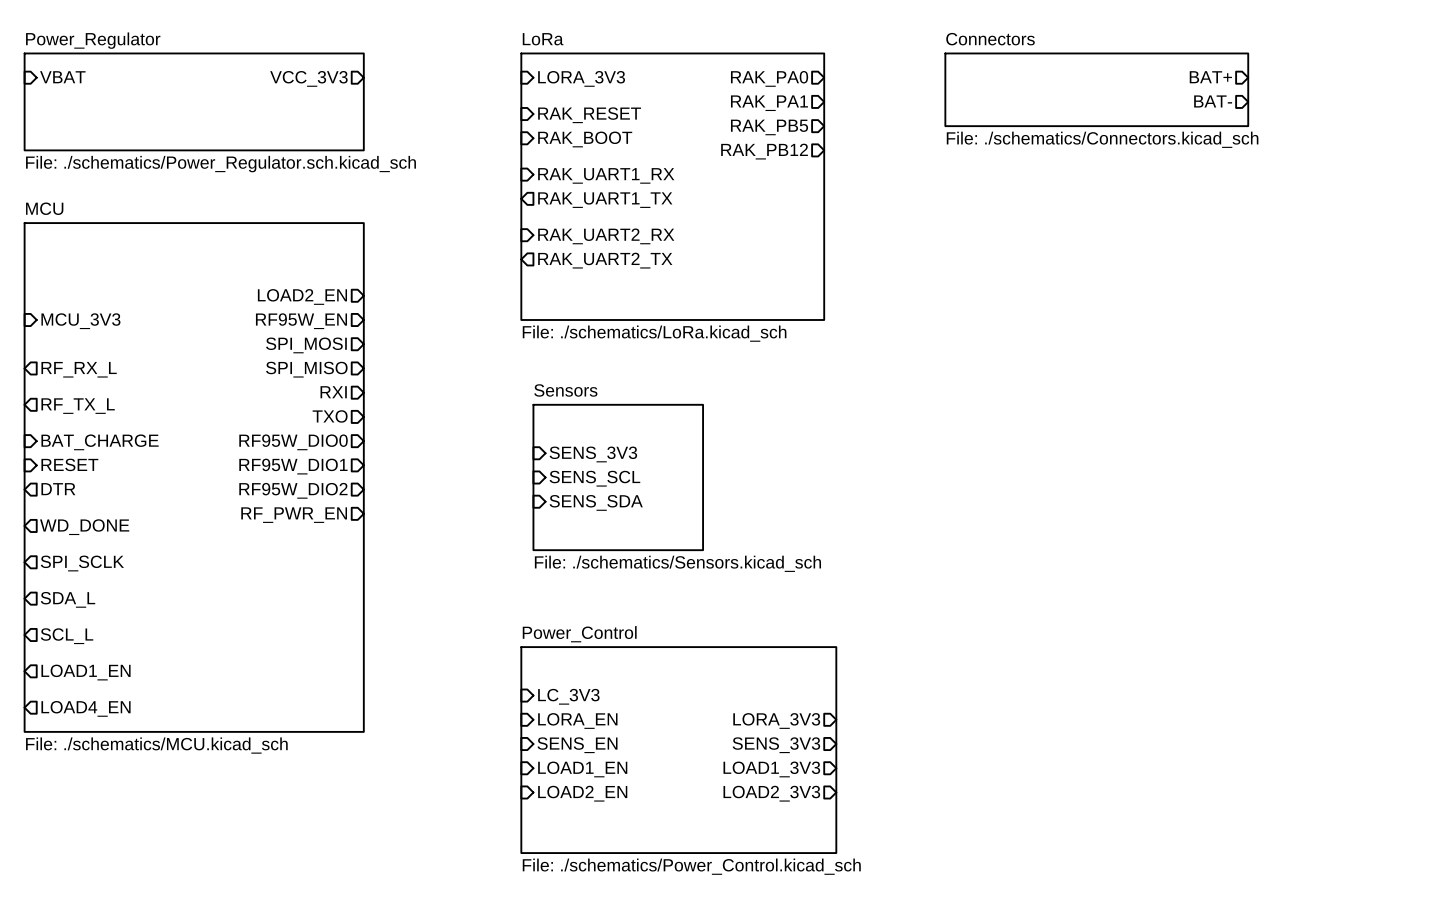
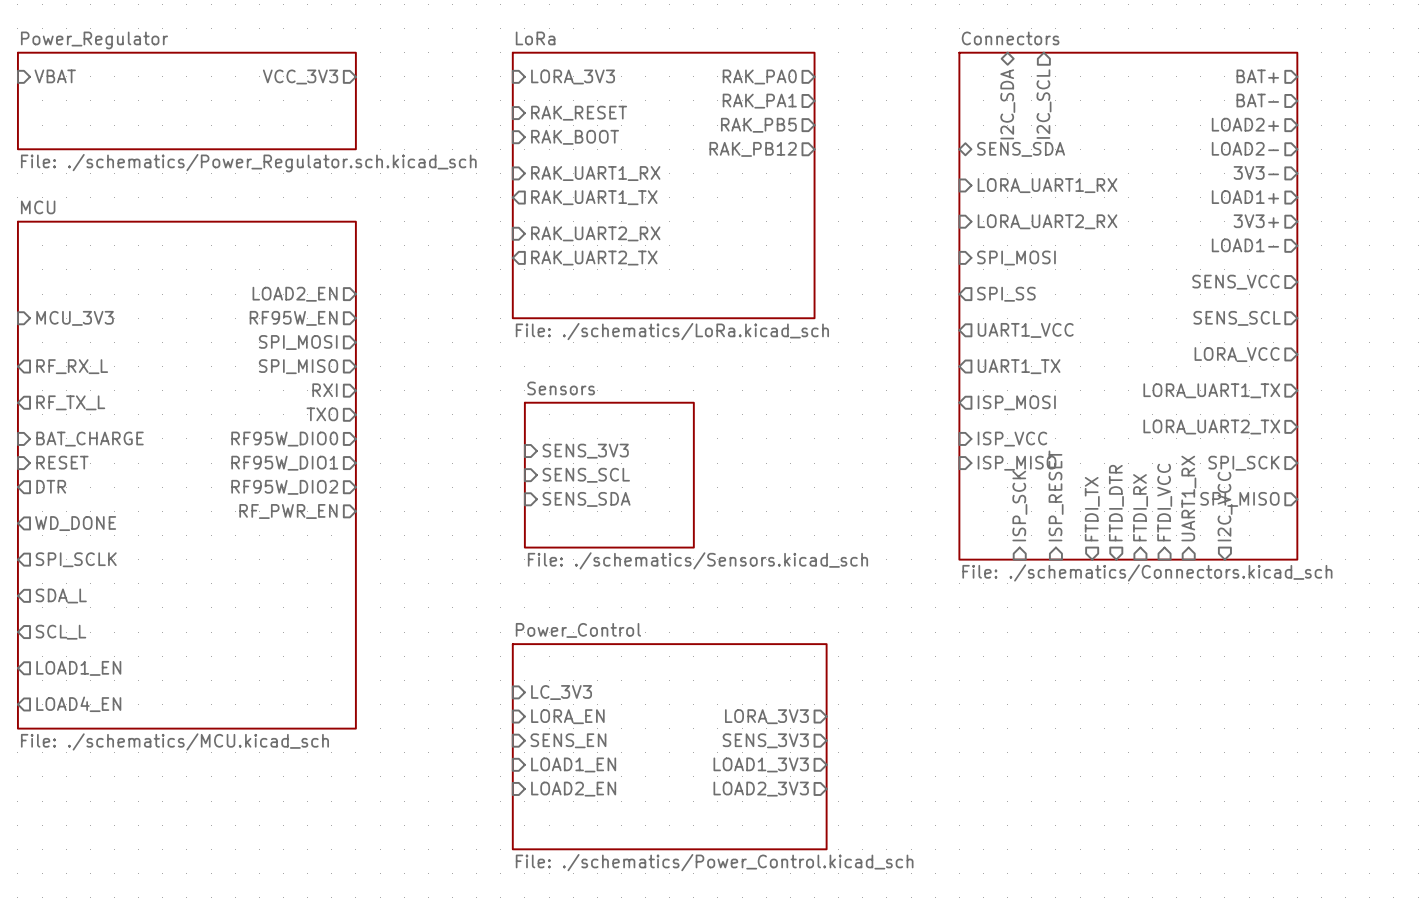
sheet pin position: BAT+ (1210, 77) -> BAT+ (1257, 76)
sheet Connectors: File: ./schematics/Connectors.kicad_sch (1096, 89) -> none
sheet pin position: BAT- (1213, 101) -> BAT- (1257, 100)
sheet pin: none -> I2C_SDA (1007, 104)
sheet pin: none -> I2C_SCL (1043, 104)
sheet pin: none -> LOAD2+ (1245, 124)
sheet pin: none -> LOAD2- (1245, 148)
sheet pin: none -> SENS_SDA (1021, 149)
sheet pin: none -> 3V3- (1256, 172)
sheet pin: none -> LORA_UART1_RX (1047, 185)
sheet pin: none -> LOAD1+ (1245, 197)
sheet pin: none -> 3V3+ (1256, 221)
sheet pin: none -> LORA_UART2_RX (1047, 221)
sheet pin: none -> LOAD1- (1245, 245)
sheet pin: none -> SPI_MOSI (1016, 258)
sheet pin: none -> SENS_VCC (1235, 282)
sheet pin: none -> SPI_SS (1006, 294)
sheet Connectors: none -> File: ./schematics/Connectors.kicad_sch (1128, 306)
sheet pin: none -> SENS_SCL (1237, 318)
sheet pin: none -> UART1_VCC (1025, 330)
sheet pin: none -> LORA_VCC (1237, 354)
sheet pin: none -> UART1_TX (1019, 366)
sheet pin: none -> LORA_UART1_TX (1211, 390)
sheet pin: none -> ISP_MOSI (1016, 402)
sheet pin: none -> LORA_UART2_TX (1211, 426)
sheet pin: none -> ISP_VCC (1012, 439)
sheet pin: none -> ISP_MISO (1017, 463)
sheet pin: none -> SPI_SCK (1243, 463)
sheet pin: none -> ISP_RESET (1056, 495)
sheet pin: none -> UART1_RX (1188, 498)
sheet pin: none -> SPI_MISO (1239, 499)
sheet pin: none -> FTDI_VCC (1164, 502)
sheet pin: none -> FTDI_DTR (1116, 503)
sheet pin: none -> ISP_SCK (1019, 505)
sheet pin: none -> FTDI_RX (1140, 507)
sheet pin: none -> I2C_VCC (1225, 506)
sheet pin: none -> FTDI_TX (1092, 509)

